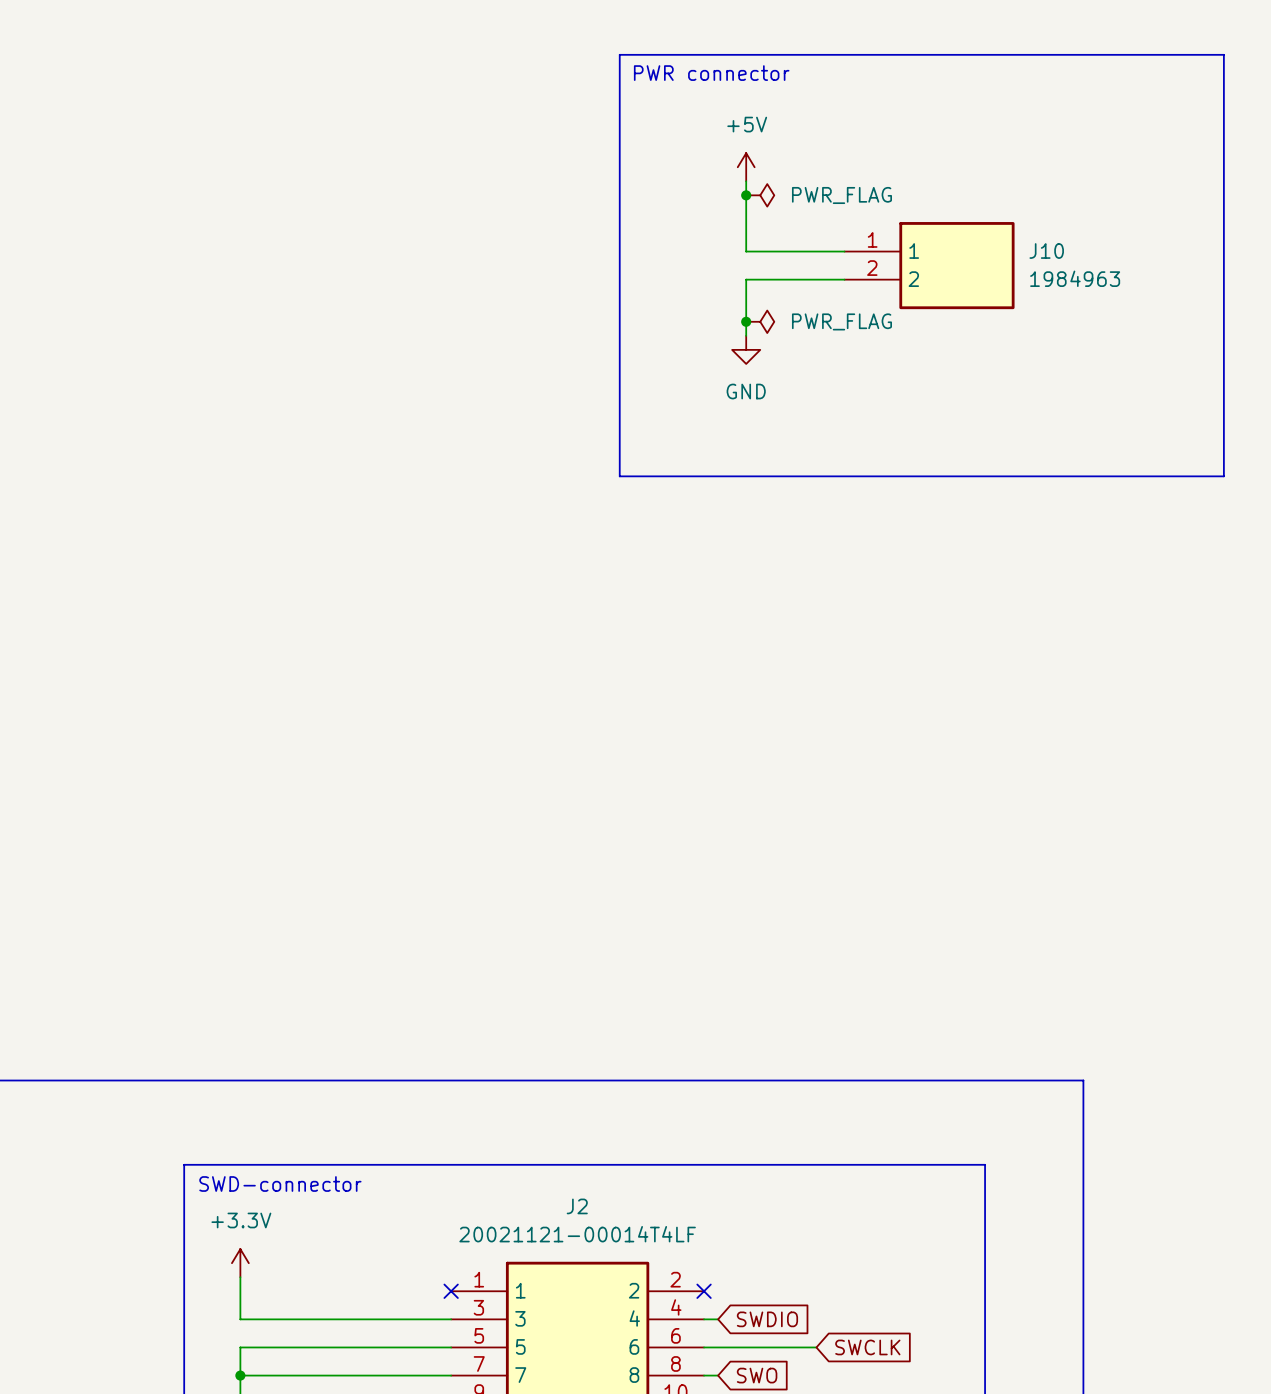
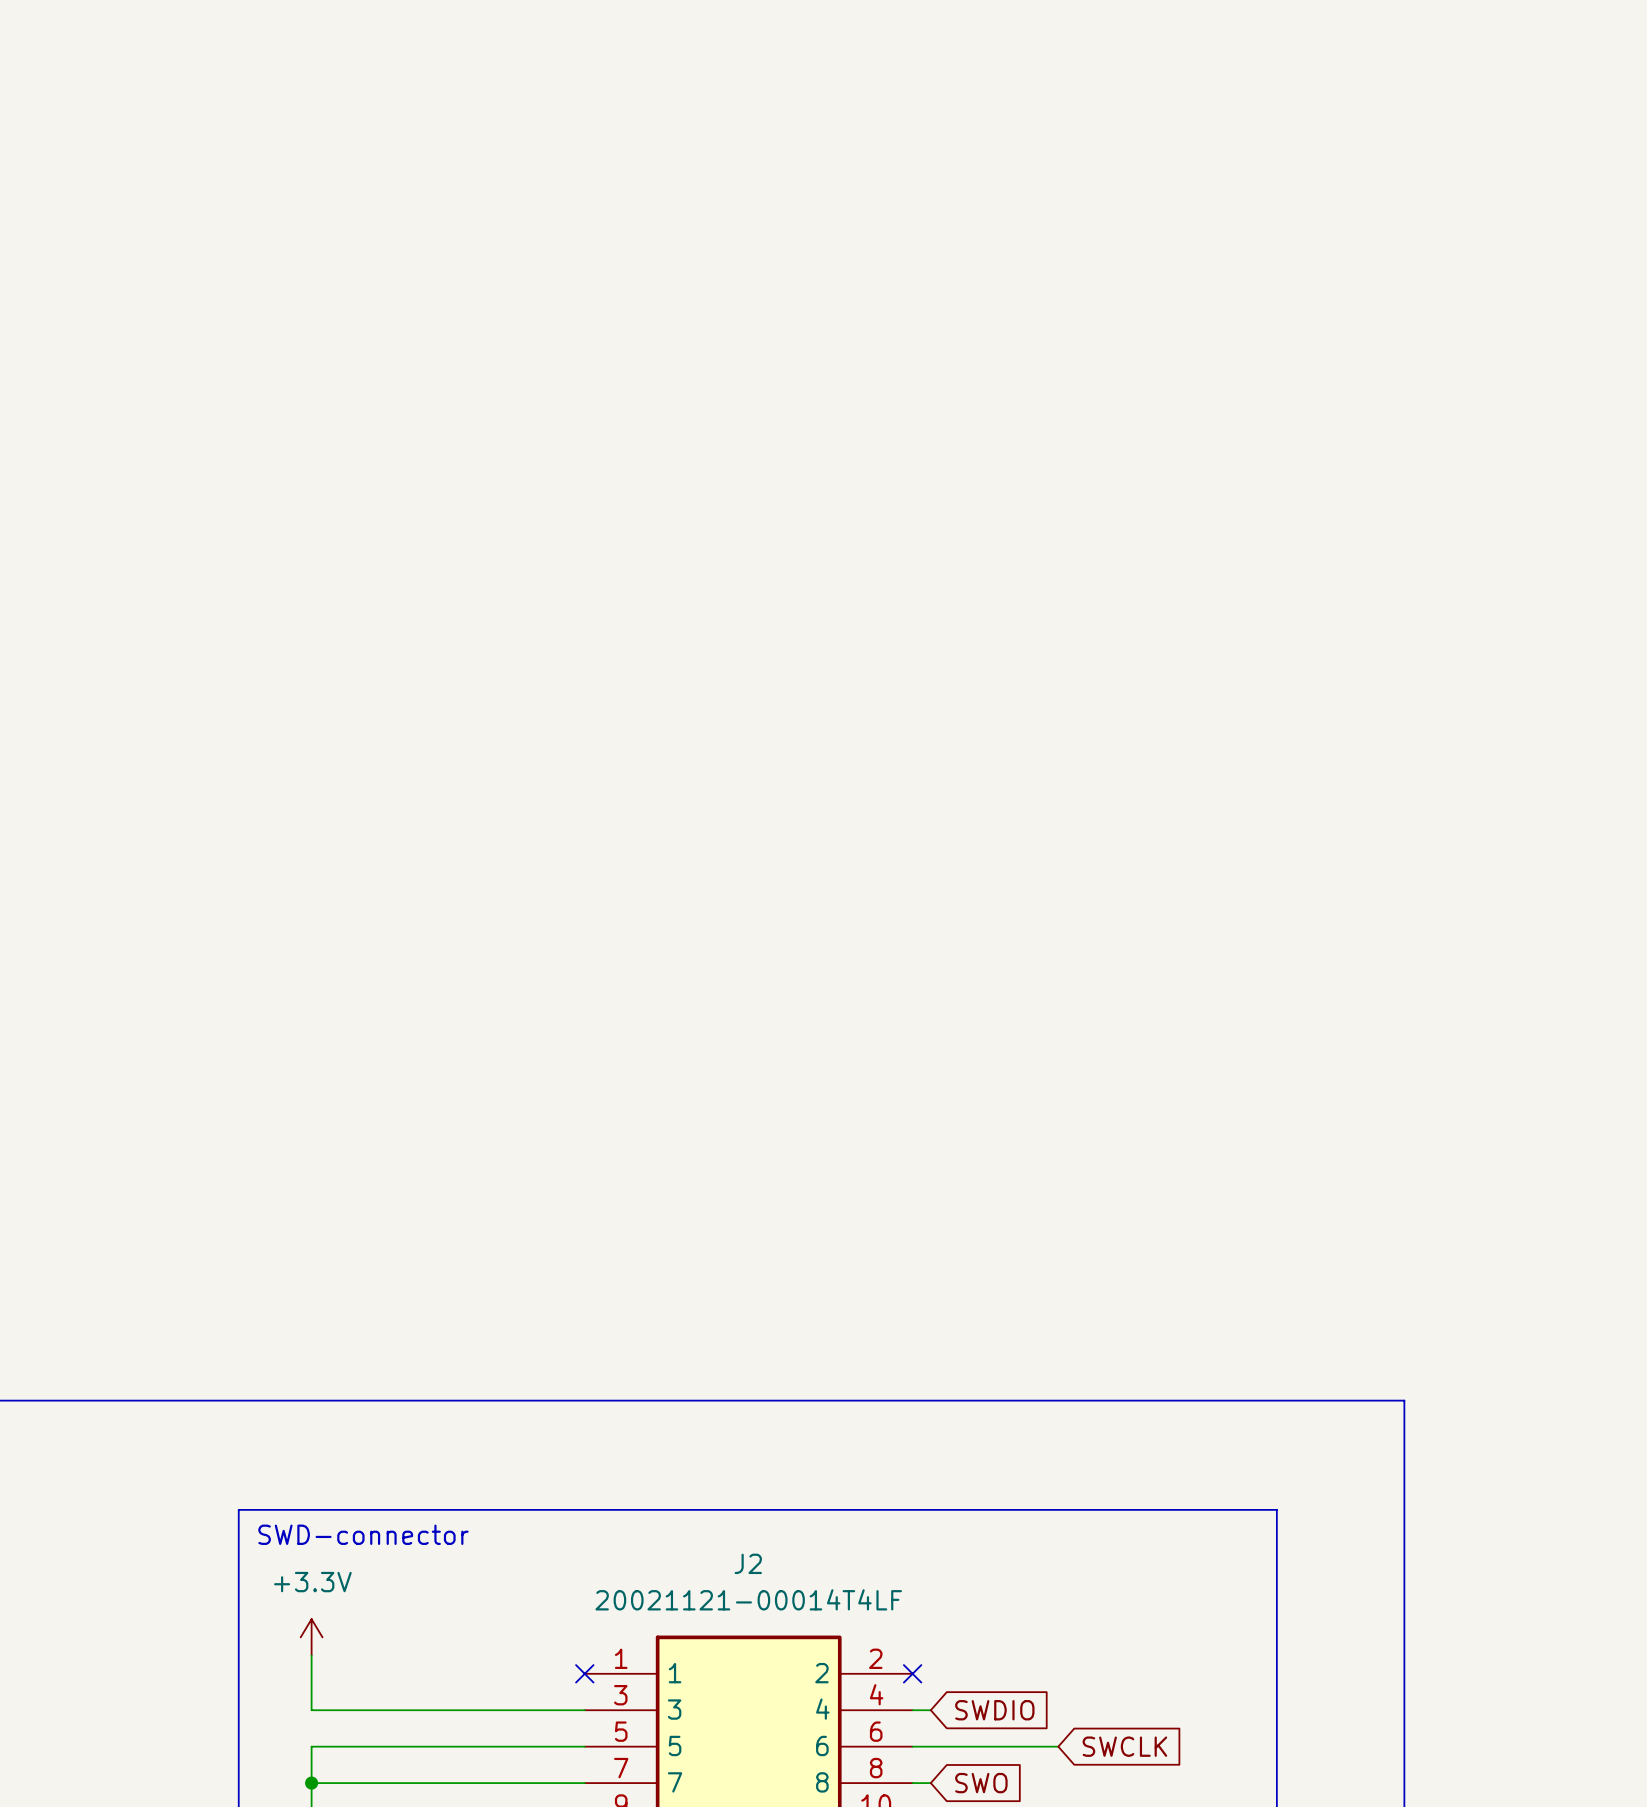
line: (619, 54) (1223, 54) (1223, 476) (619, 476) (619, 54) -> none
text: PWR connector (711, 73) -> none
power symbol: +5V (746, 167) -> none
wire: (746, 181) (746, 251) (844, 251) -> none
junction: (746, 195) -> none
power symbol: PWR_FLAG (760, 195) -> none
J10: 1984963 (929, 265) -> none
wire: (844, 279) (746, 279) (746, 335) -> none
junction: (746, 321) -> none
power symbol: PWR_FLAG (760, 321) -> none
power symbol: GND (746, 349) -> none

